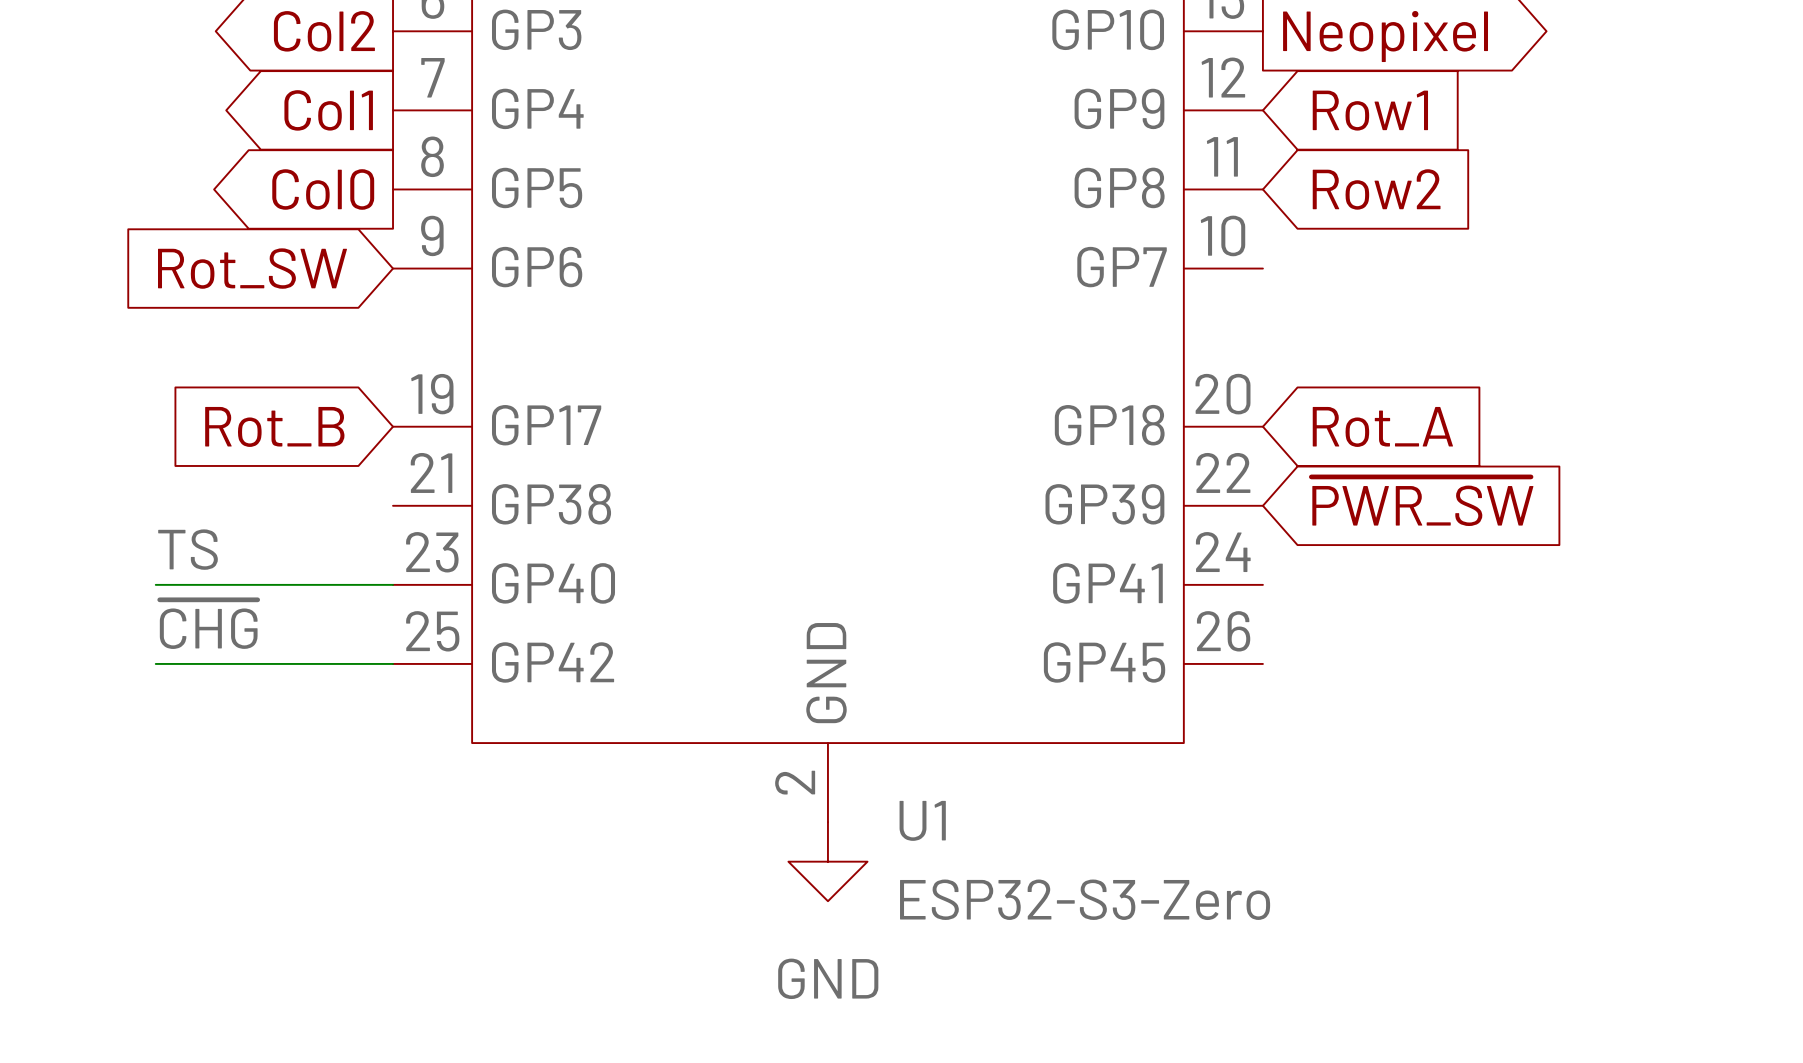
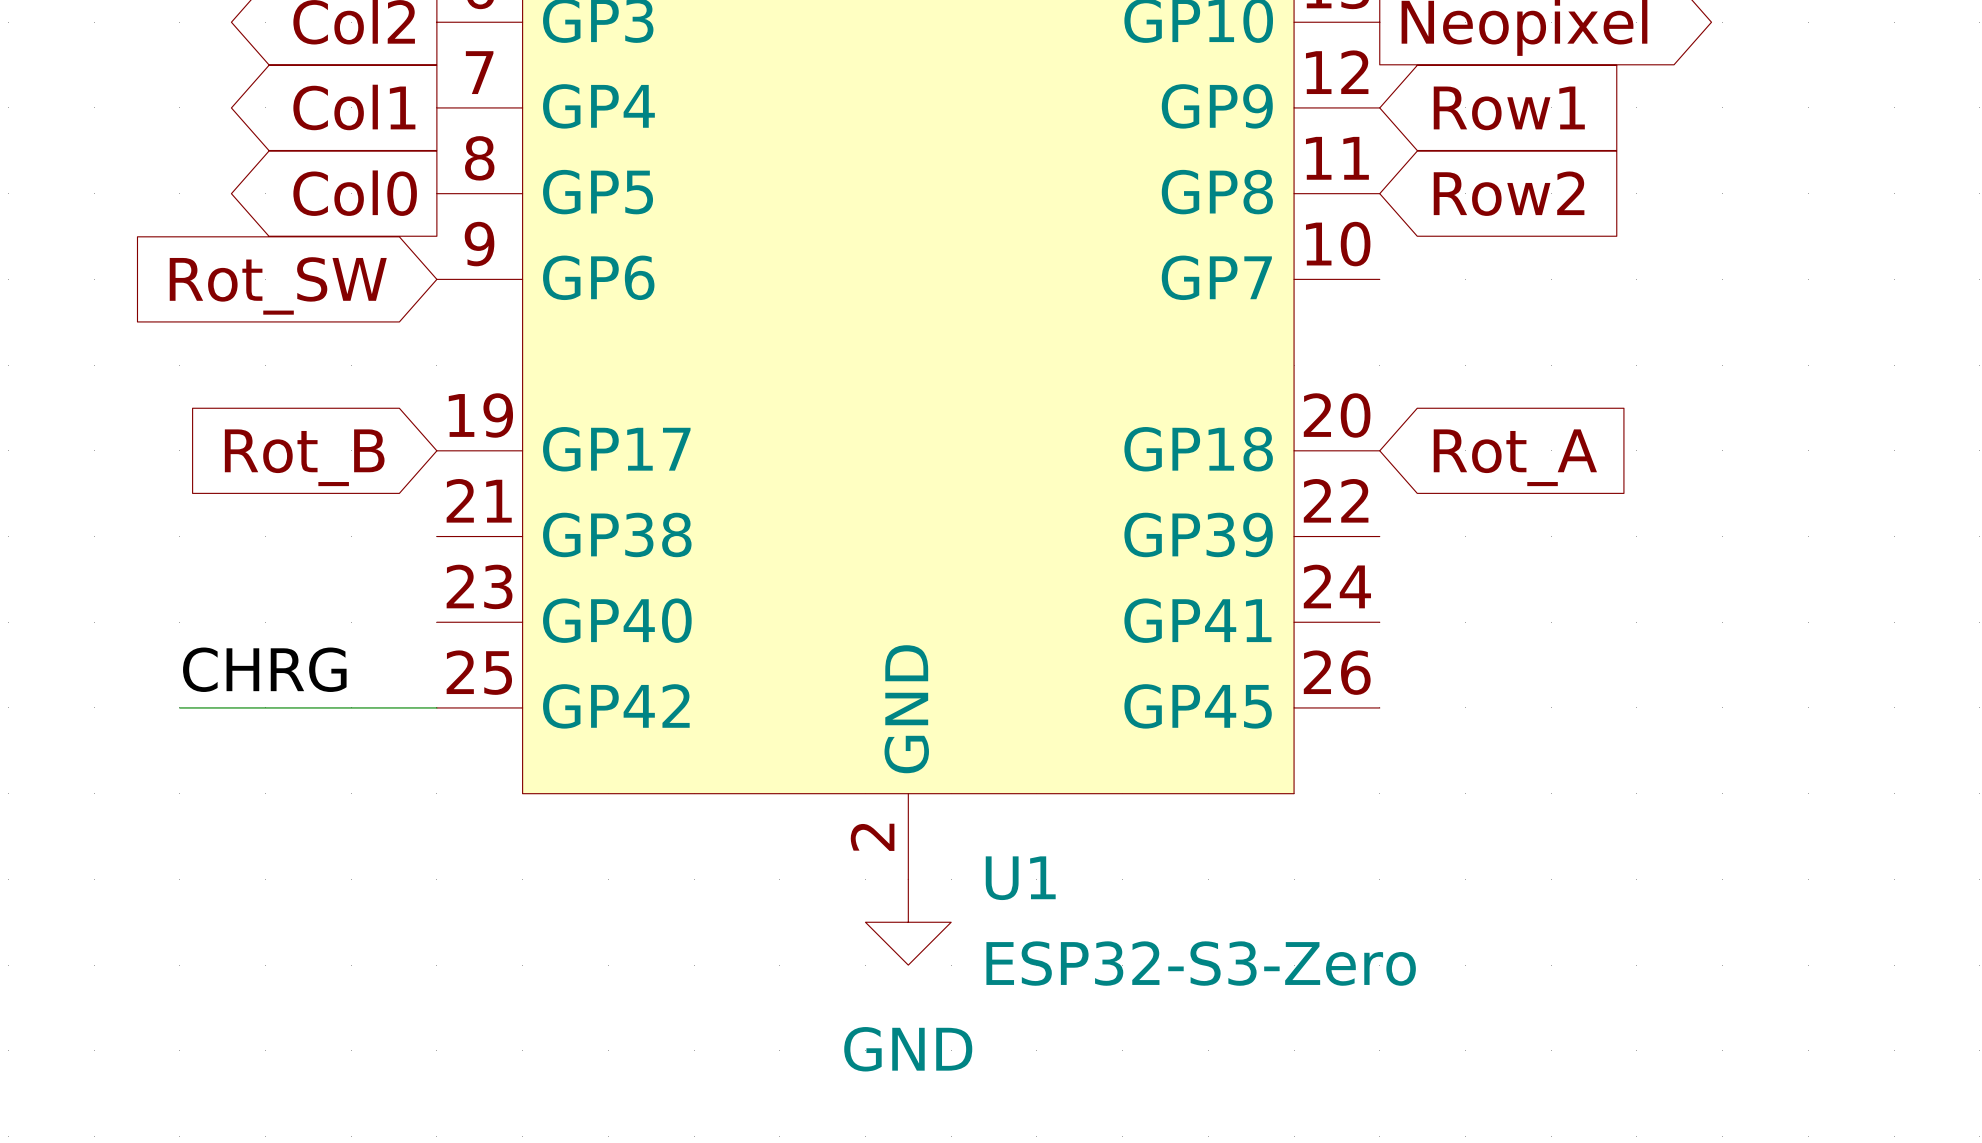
global label: ~{PWR_SW} (1422, 501) -> none
label: TS (188, 549) -> none
wire: (155, 584) (393, 584) -> none
label: ~{CHG} (208, 624) -> CHRG (264, 669)

